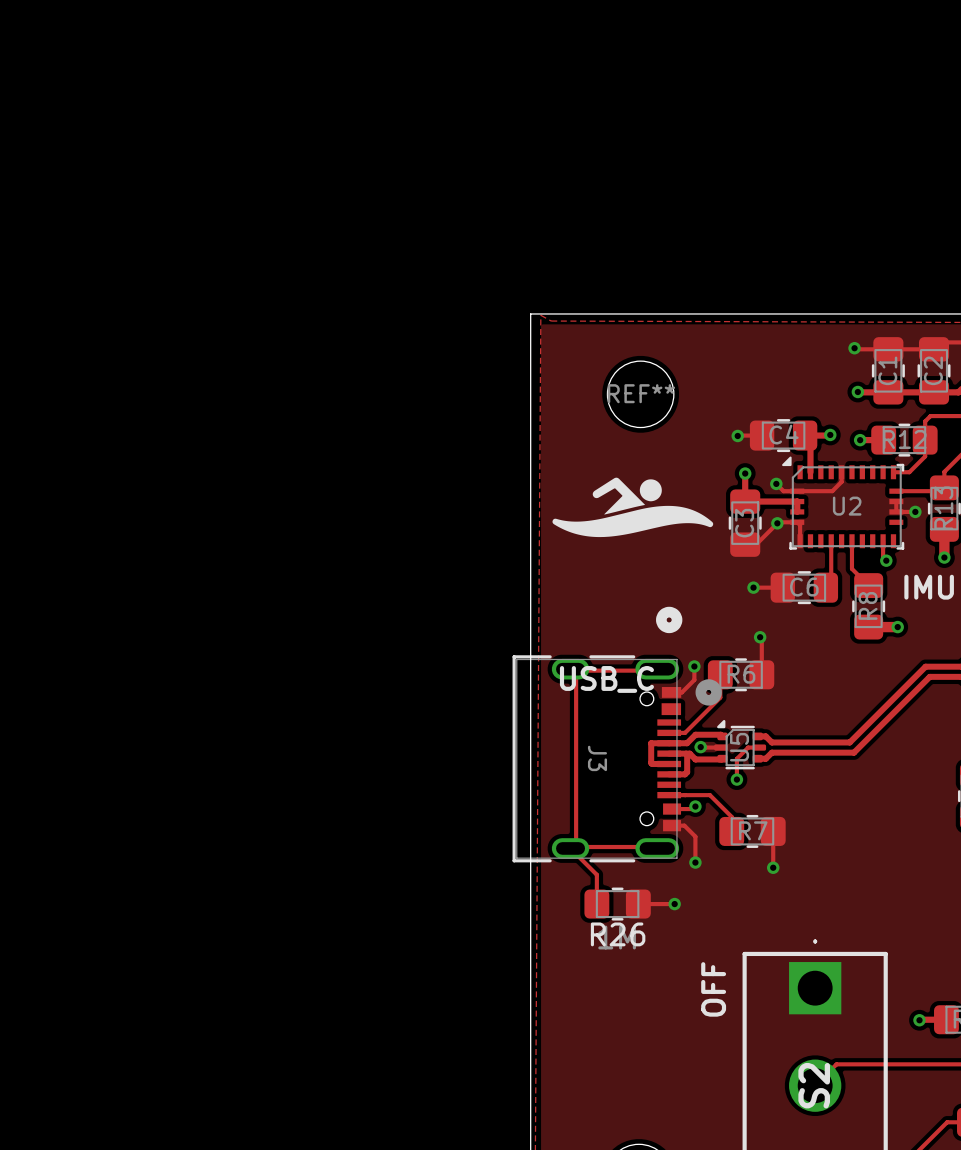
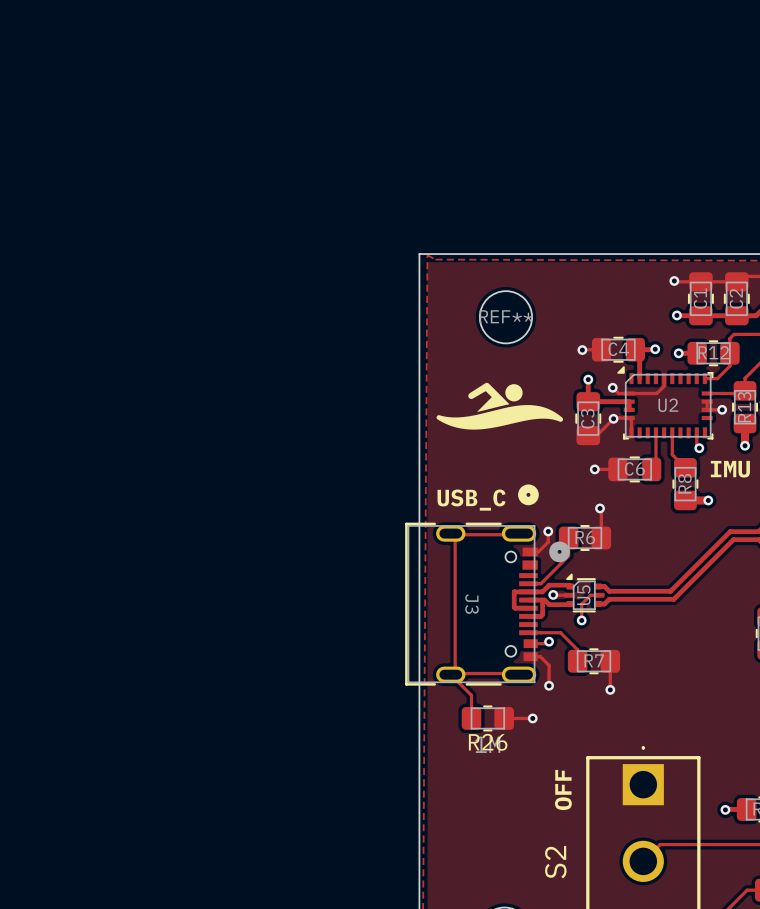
text position: USB_C (606, 679) -> USB_C (471, 500)
S2 name position: S2 (814, 1085) -> S2 (555, 862)

